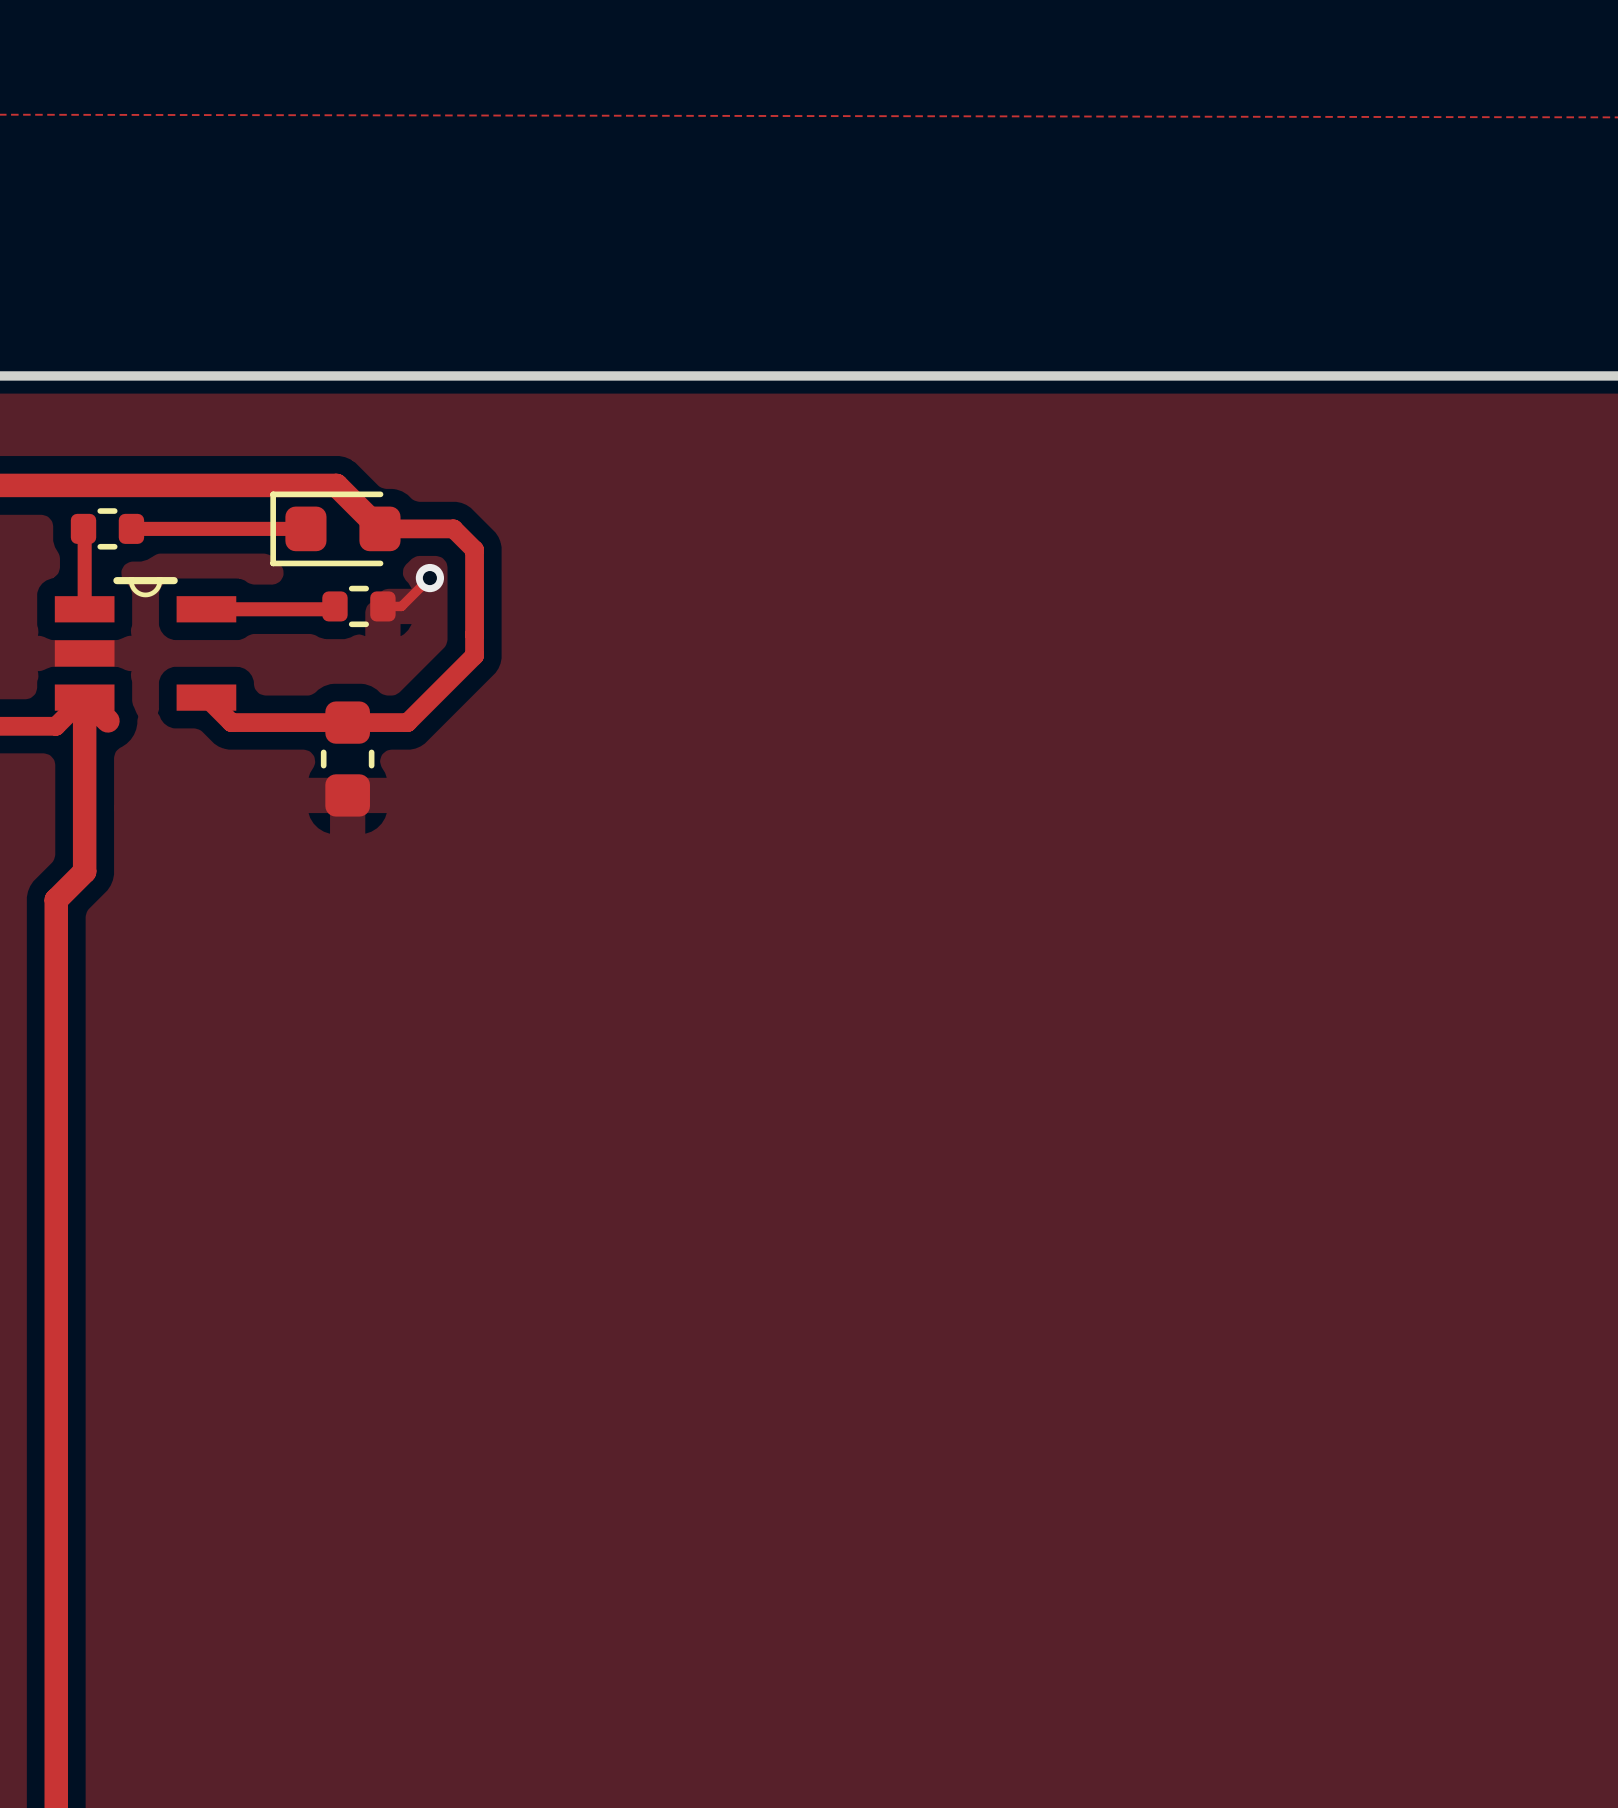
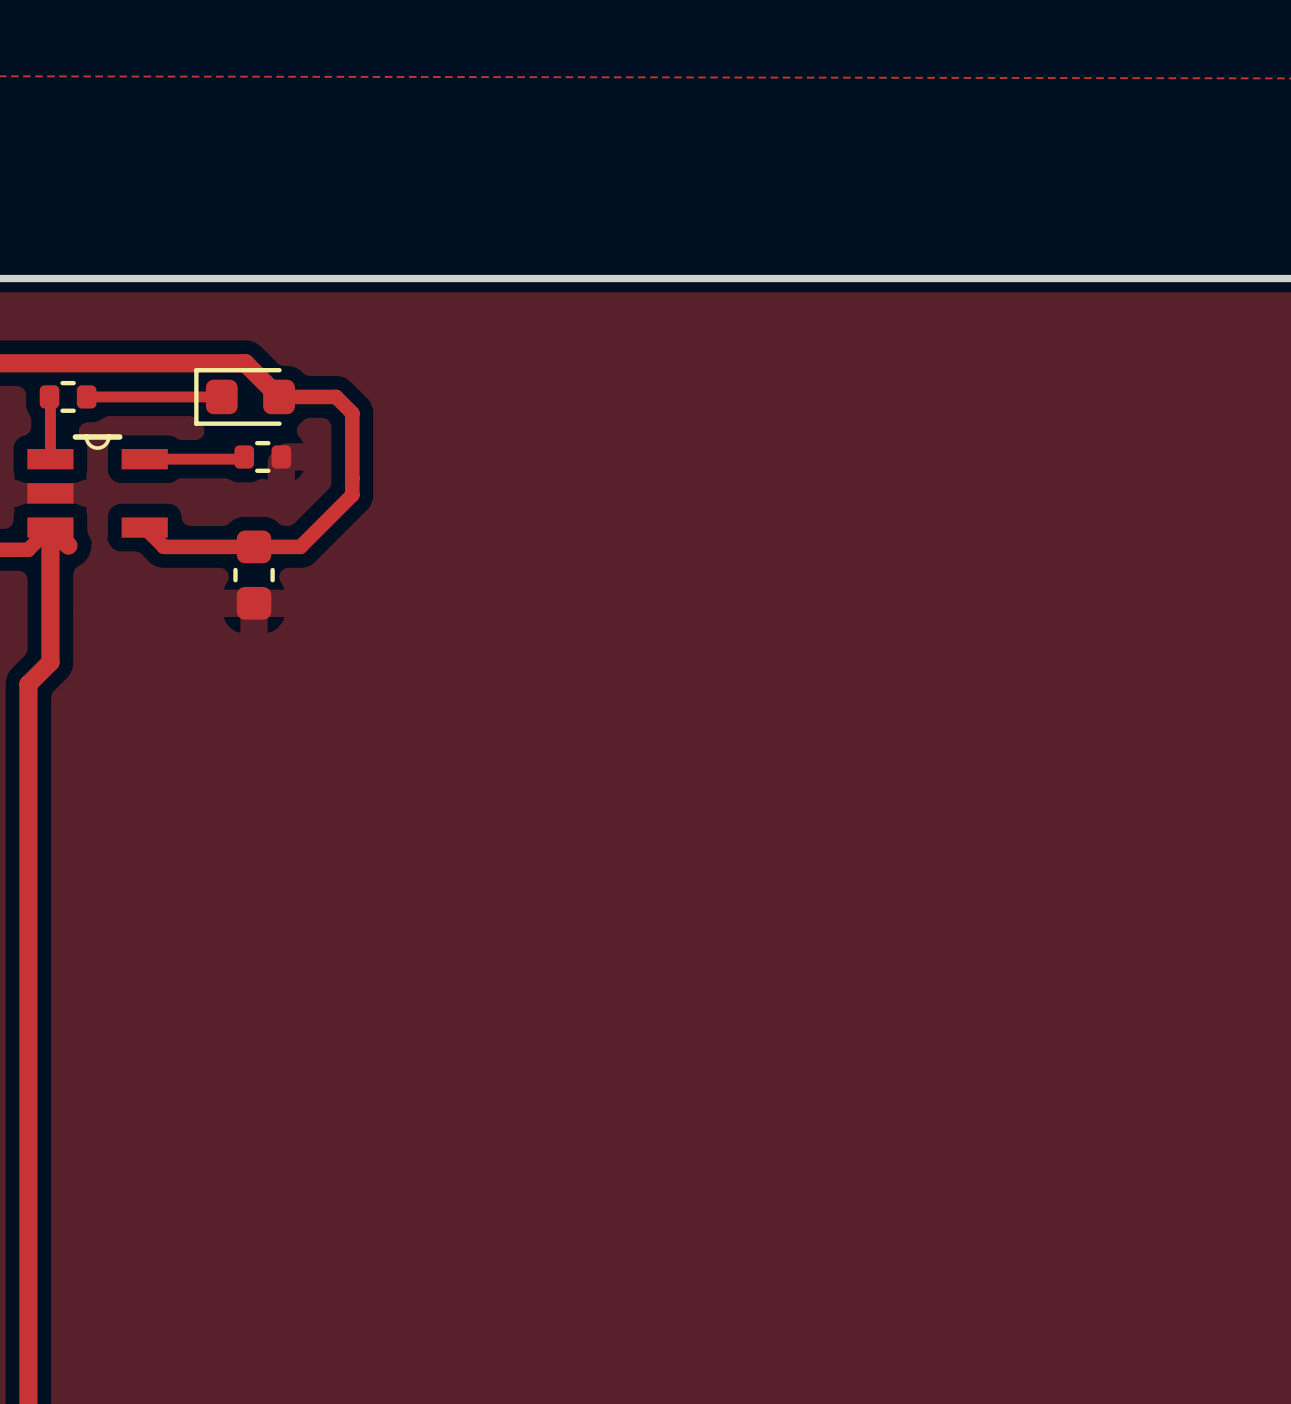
track: (429, 578) (401, 606) (382, 606) -> none
via: (429, 578) -> none

